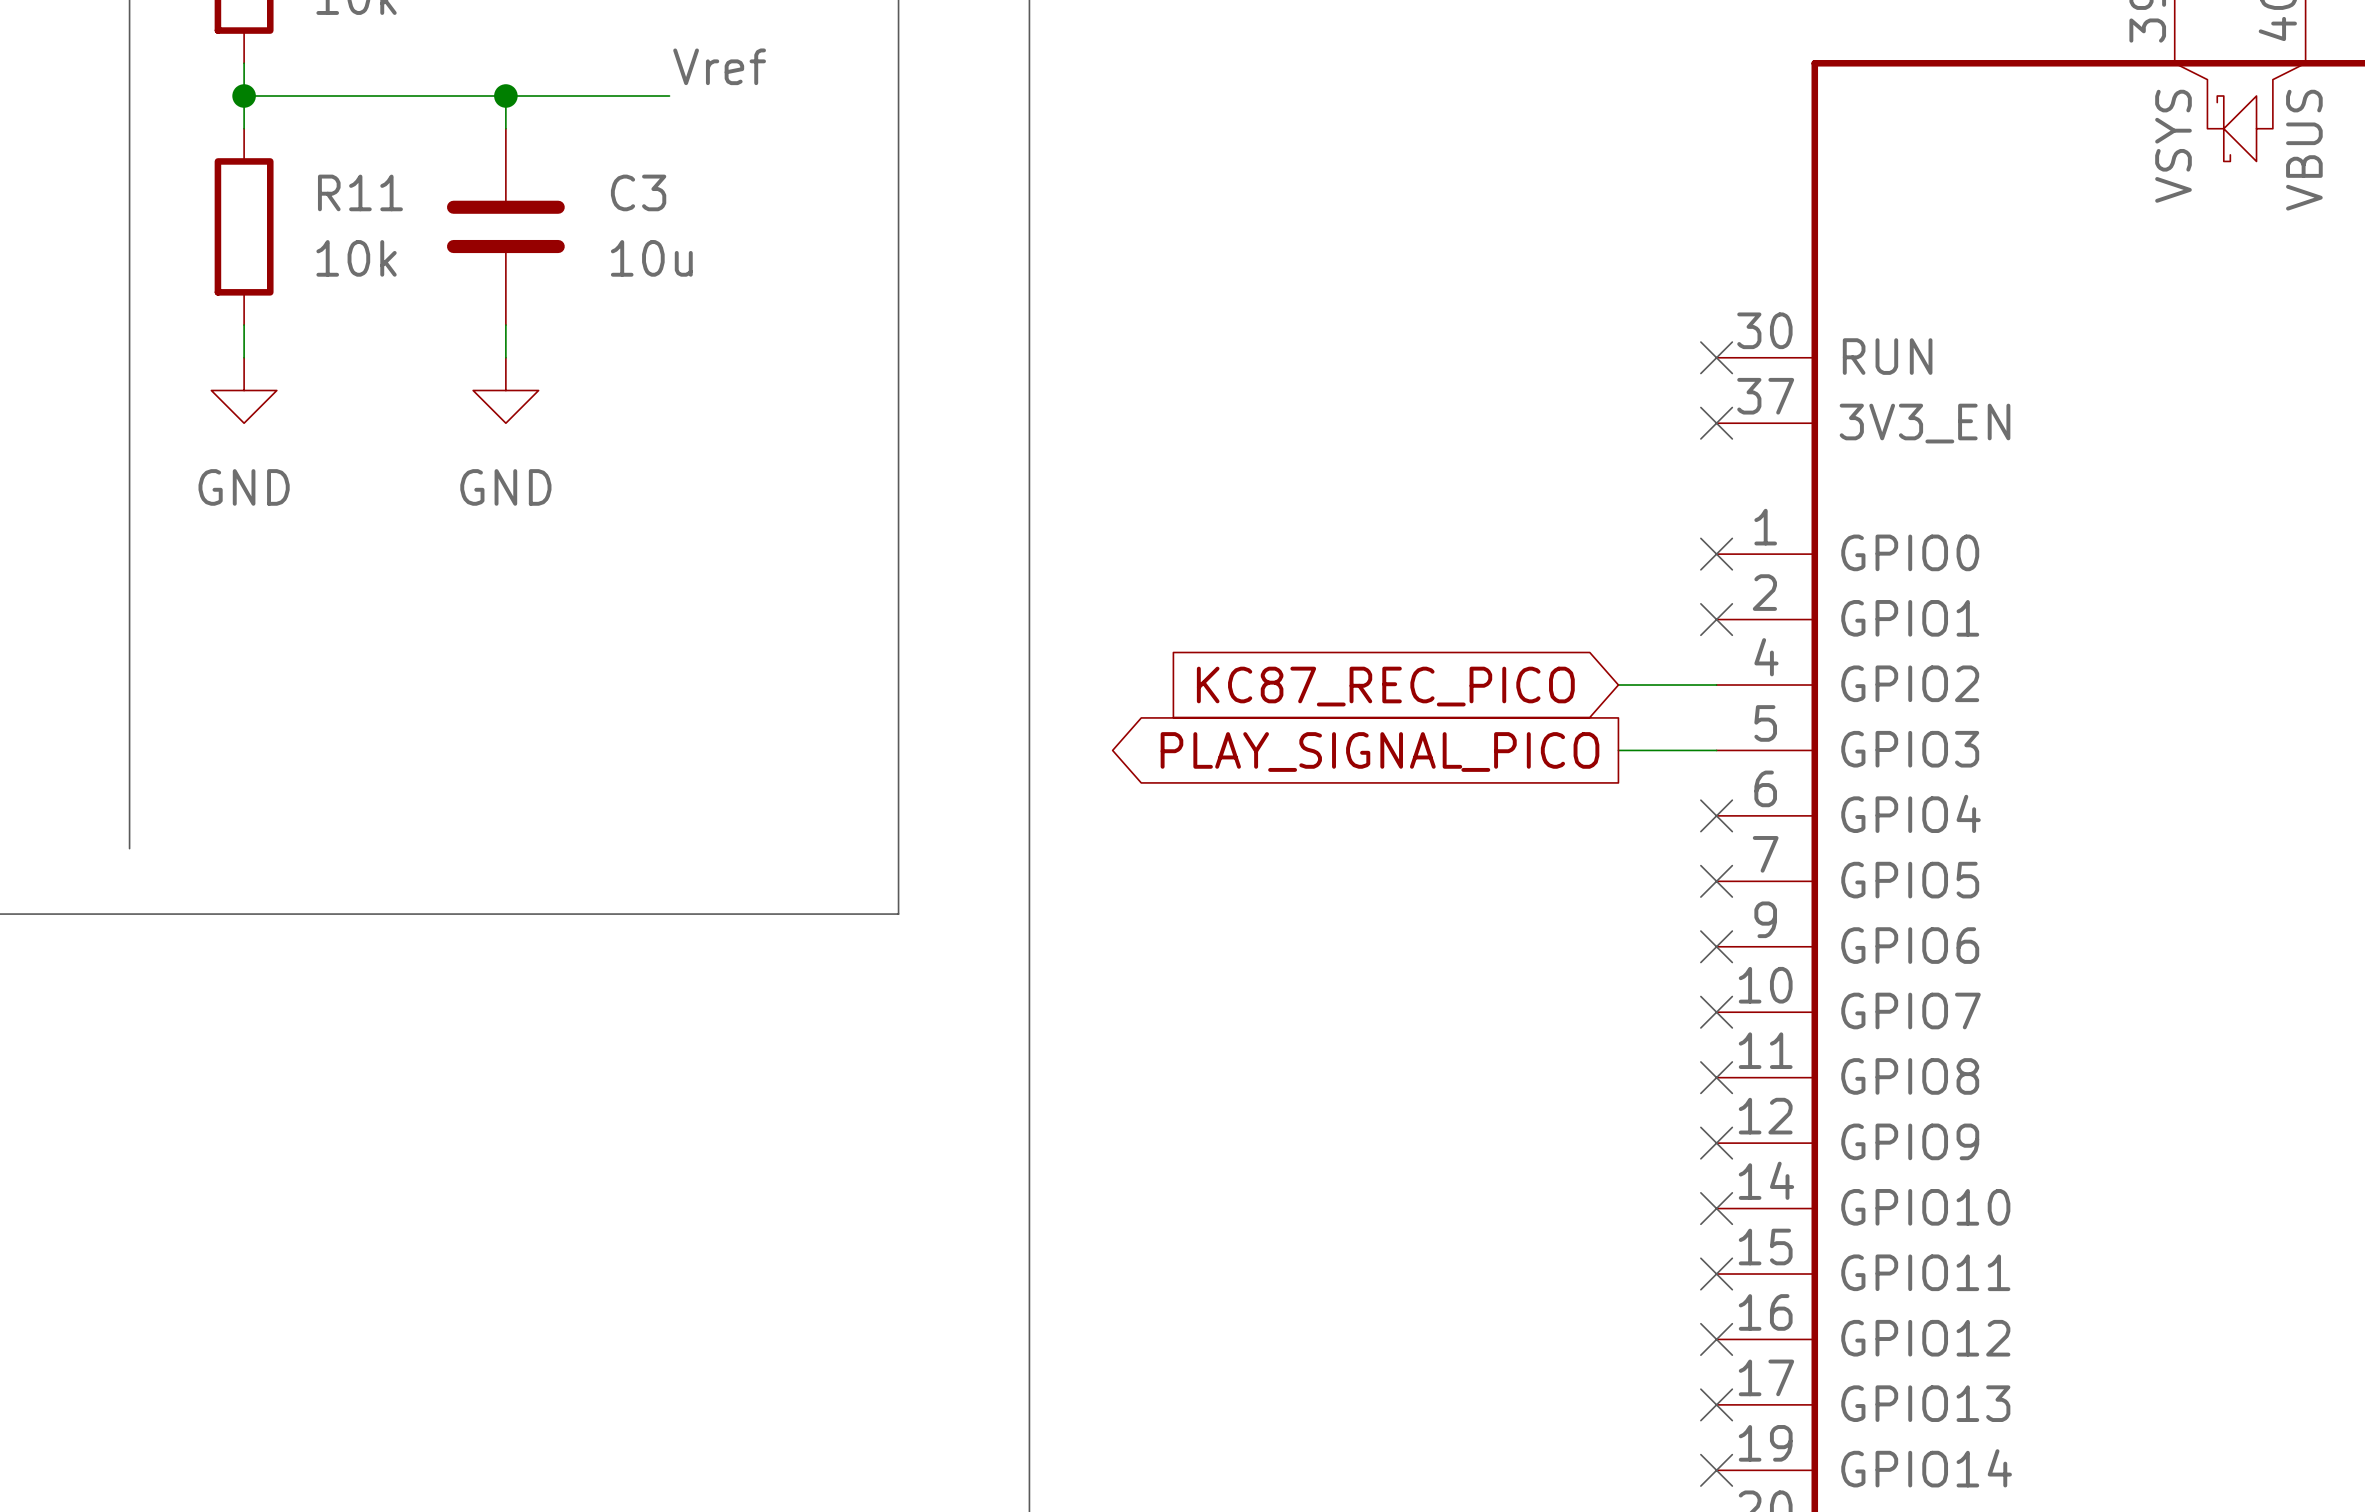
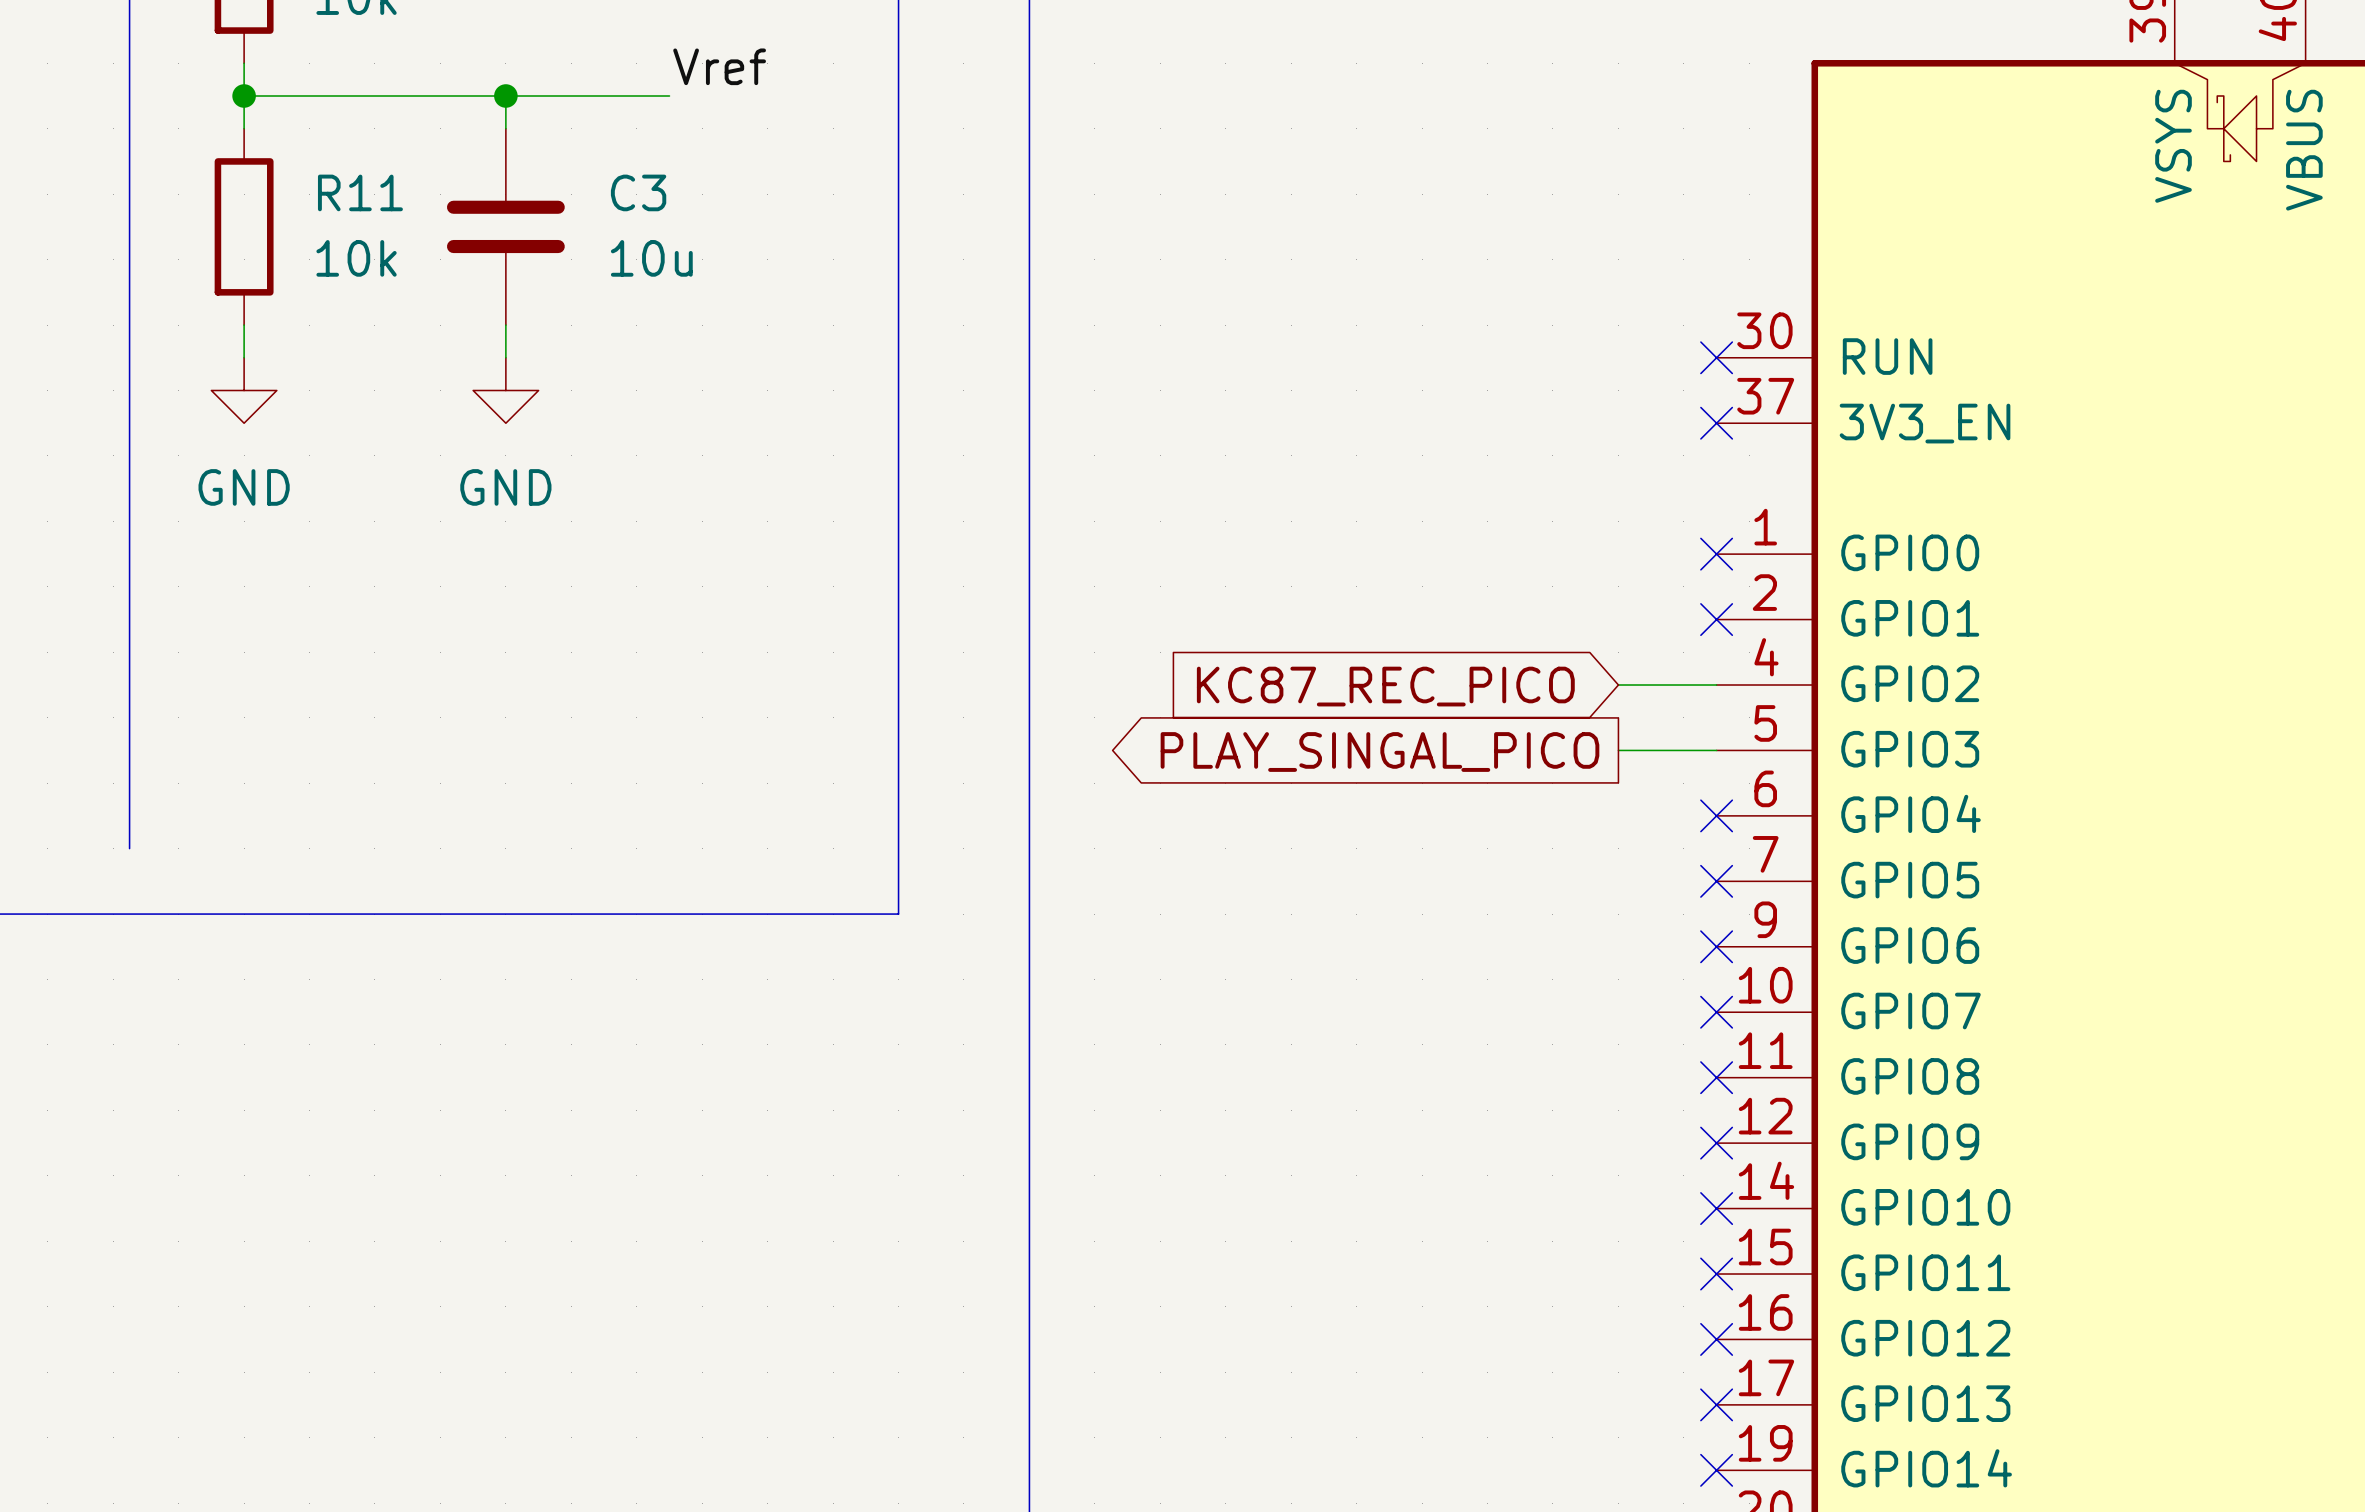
global label: PLAY_SIGNAL_PICO (1379, 752) -> PLAY_SINGAL_PICO (1379, 752)

